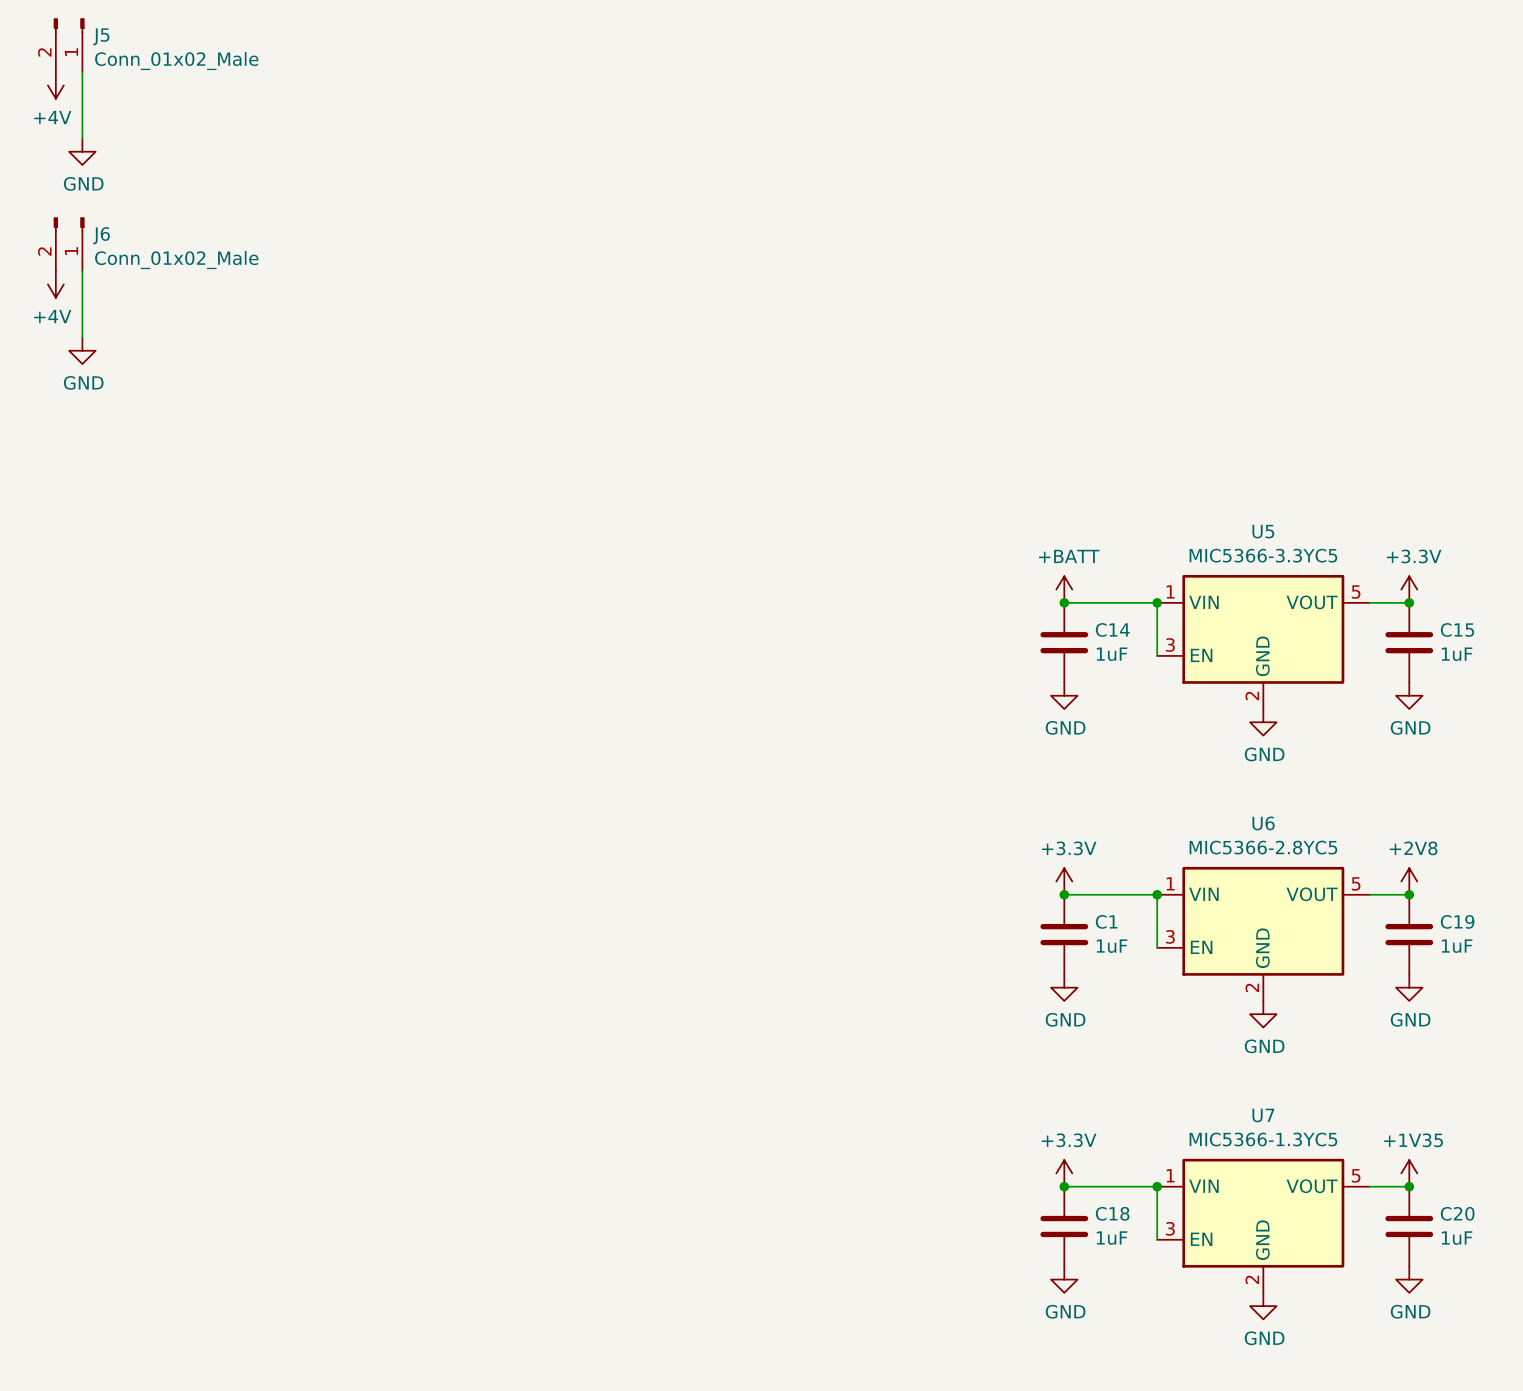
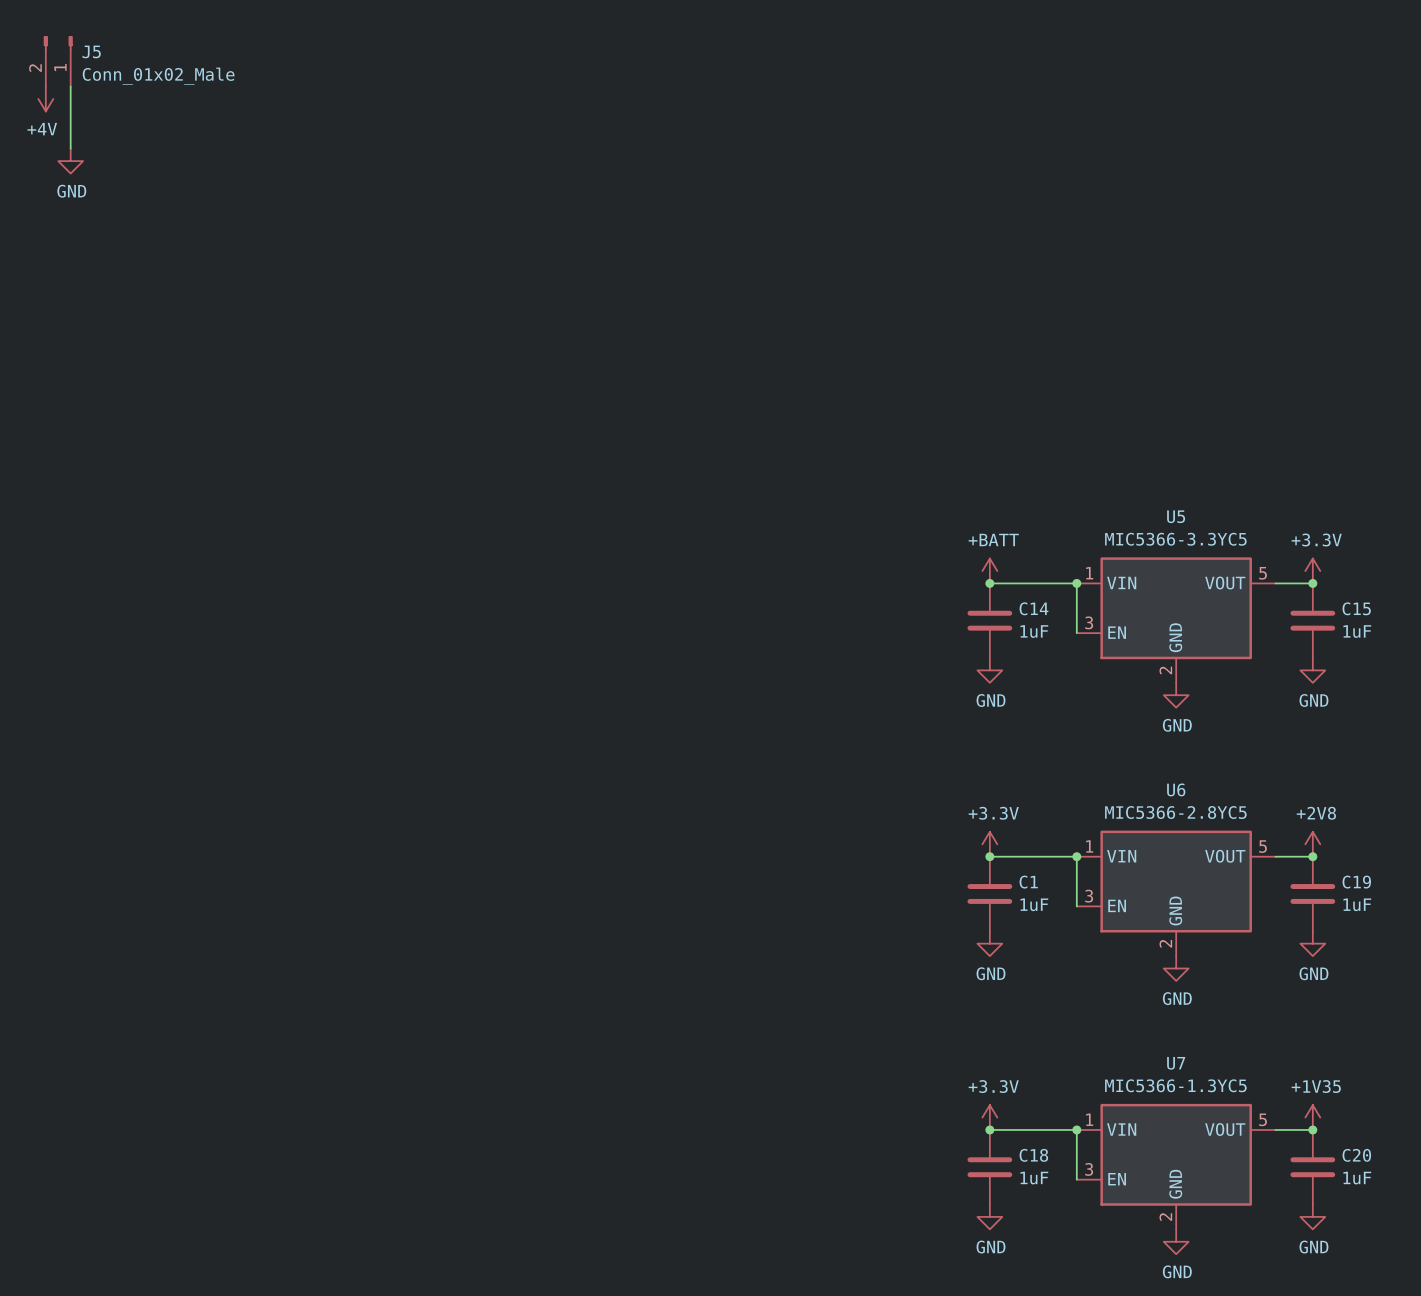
J6: Conn_01x02_Male (69, 244) -> none
wire: (82, 271) (82, 337) -> none
power symbol: +4V (55, 284) -> none
power symbol: GND (82, 350) -> none

